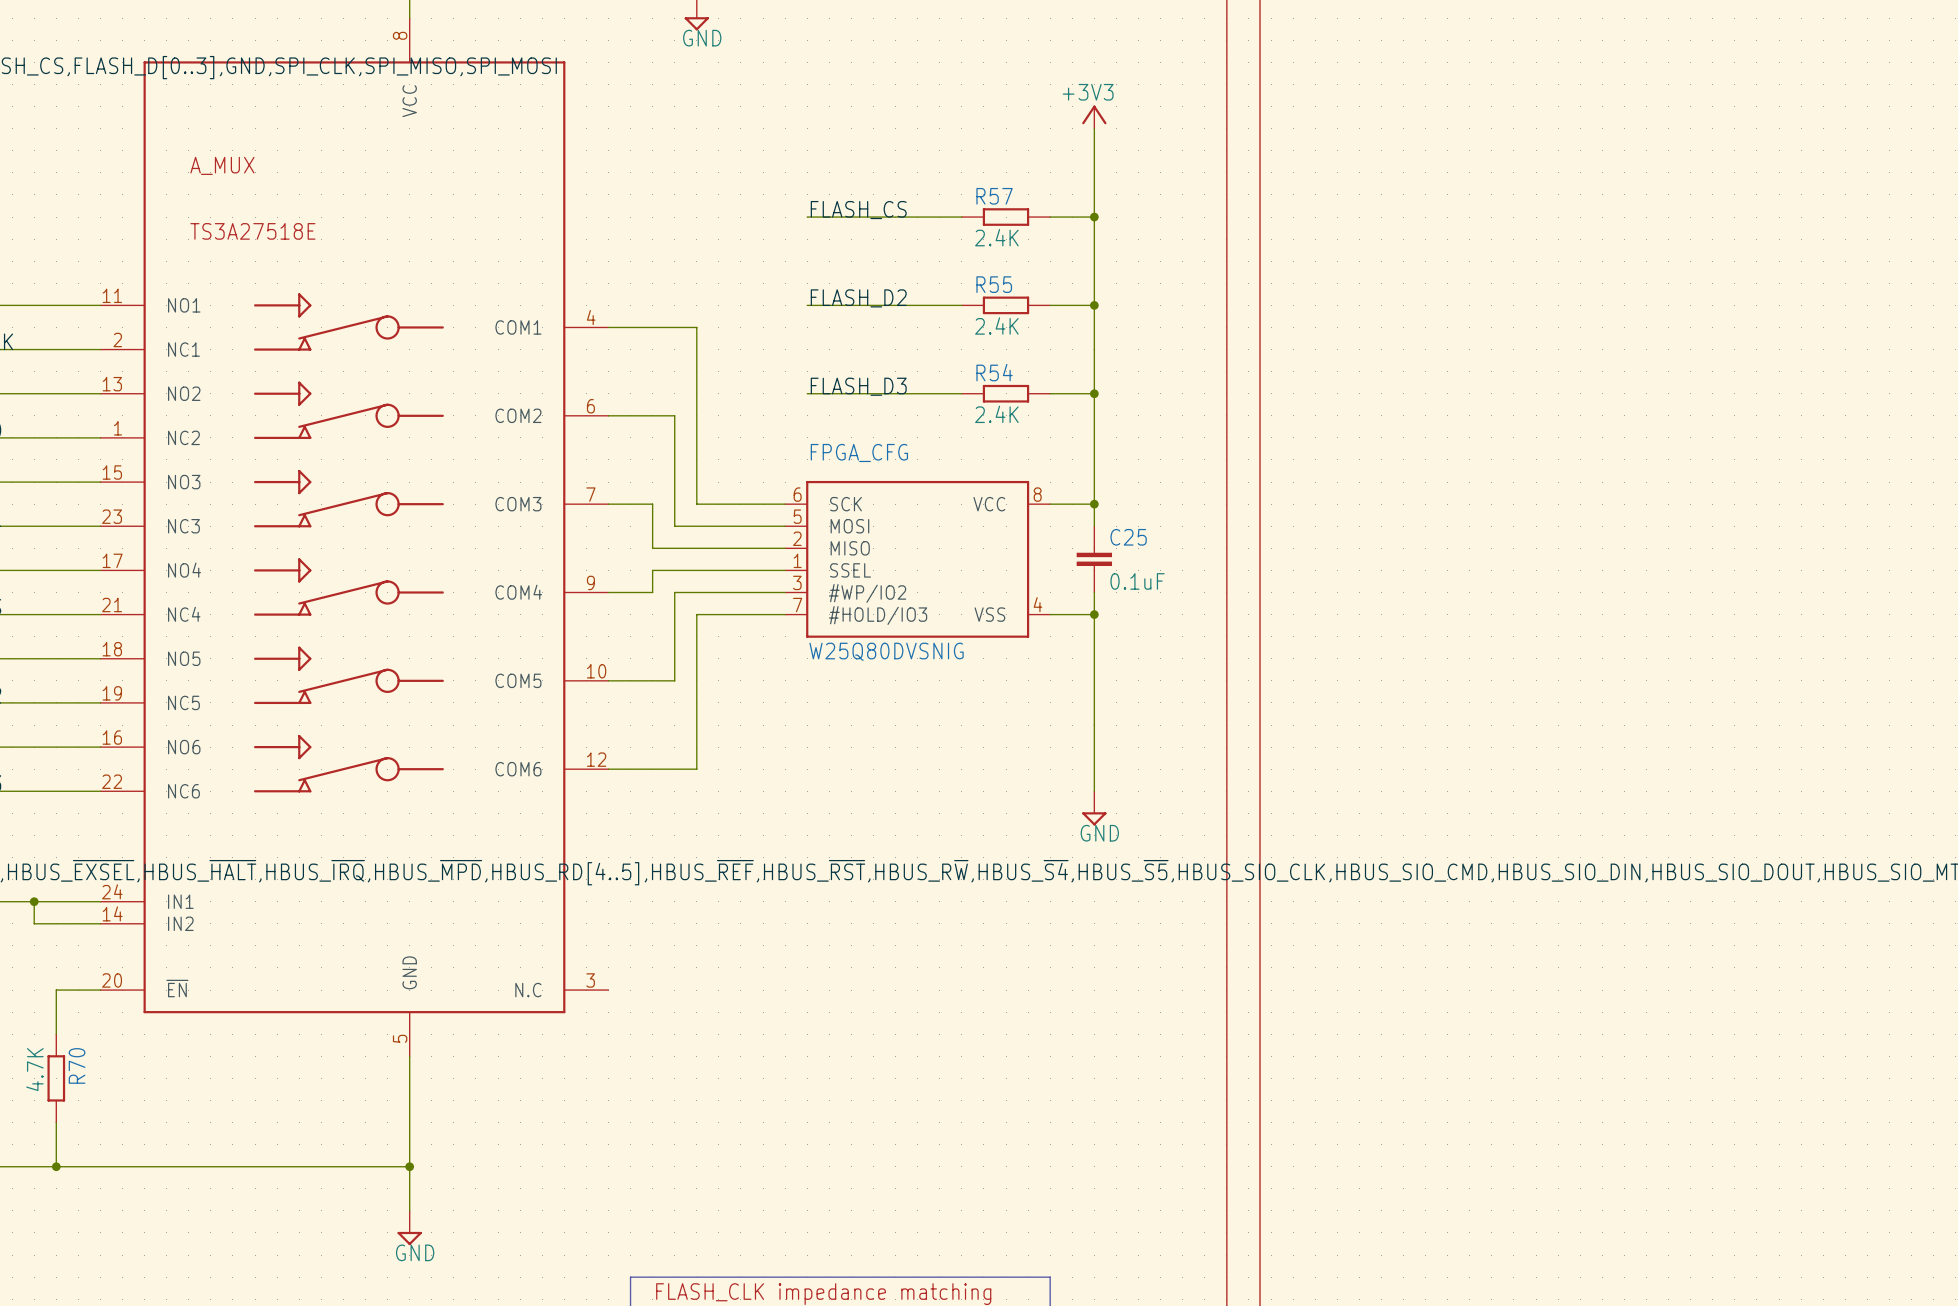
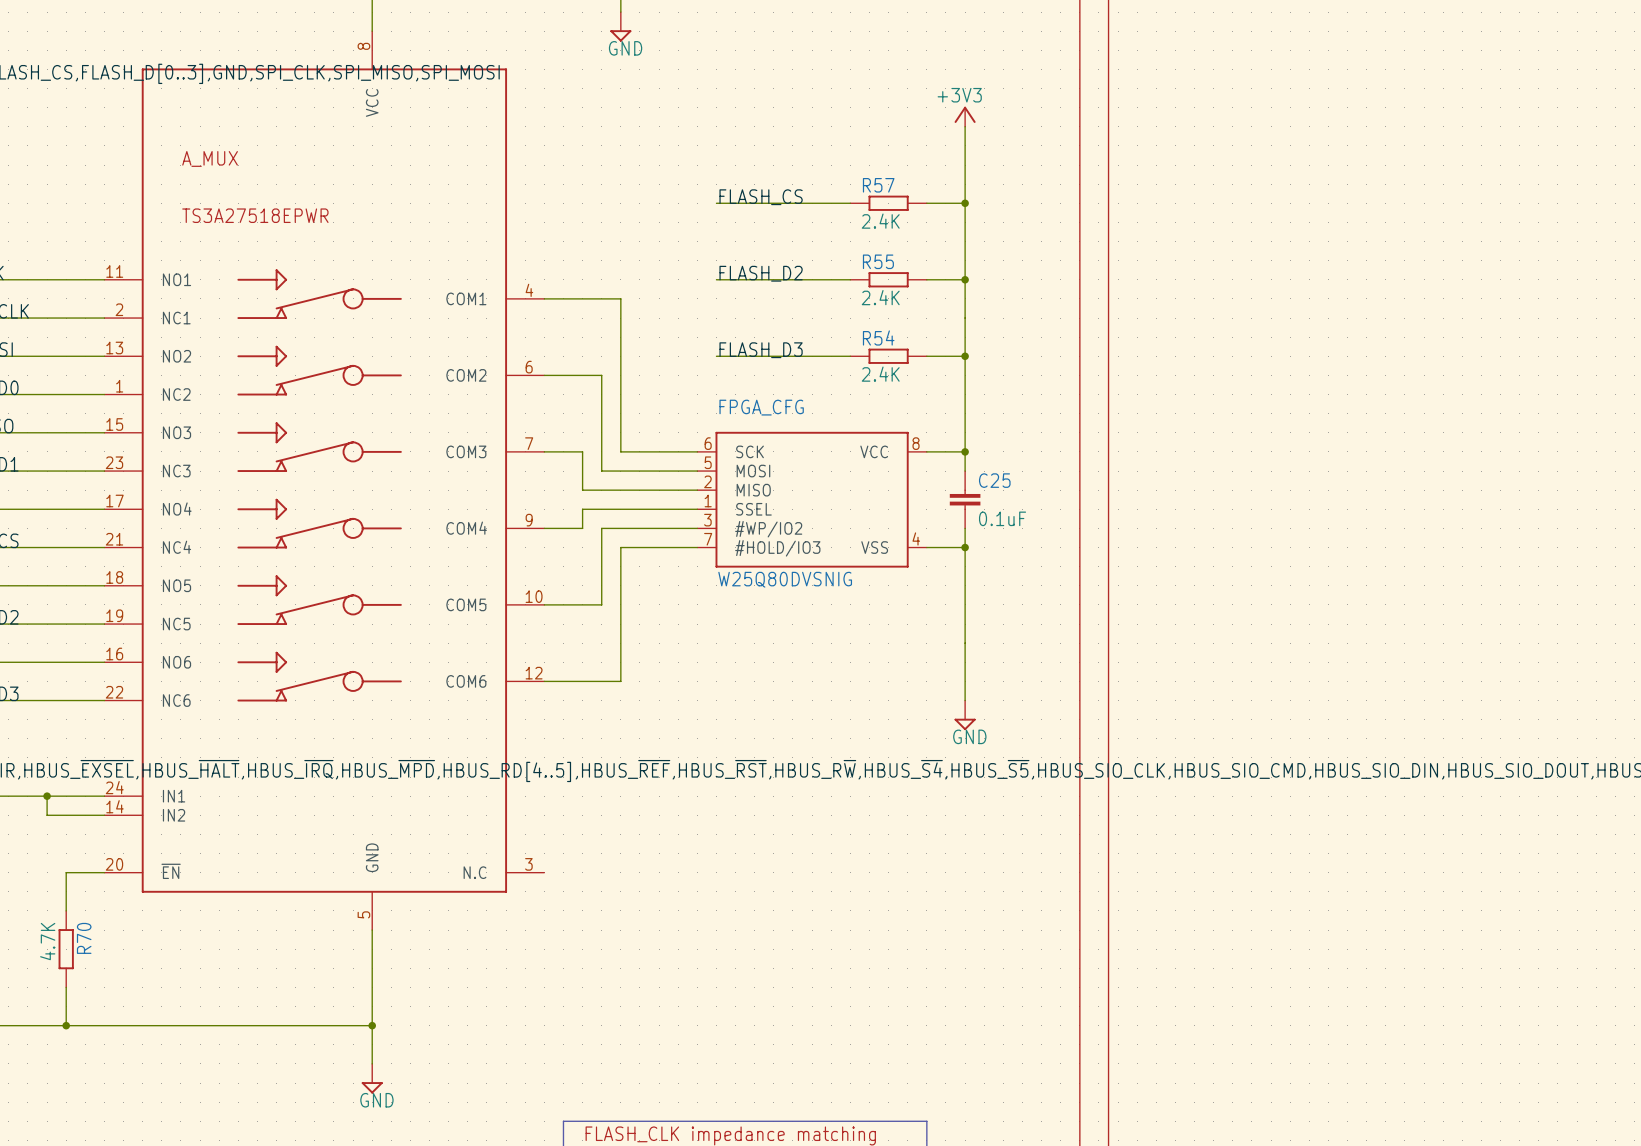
A_MUX value: TS3A27518E (252, 231) -> TS3A27518EPWR (255, 215)

